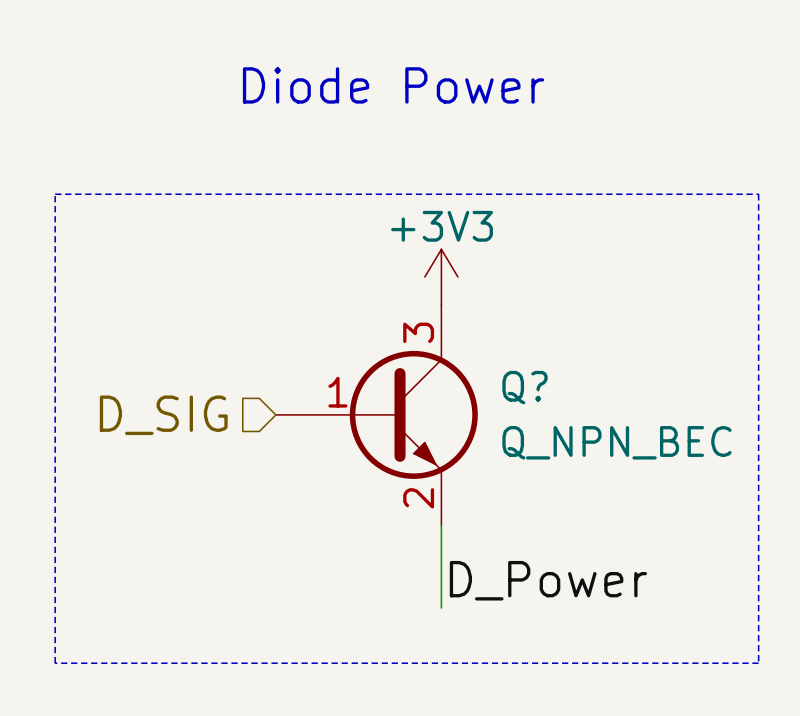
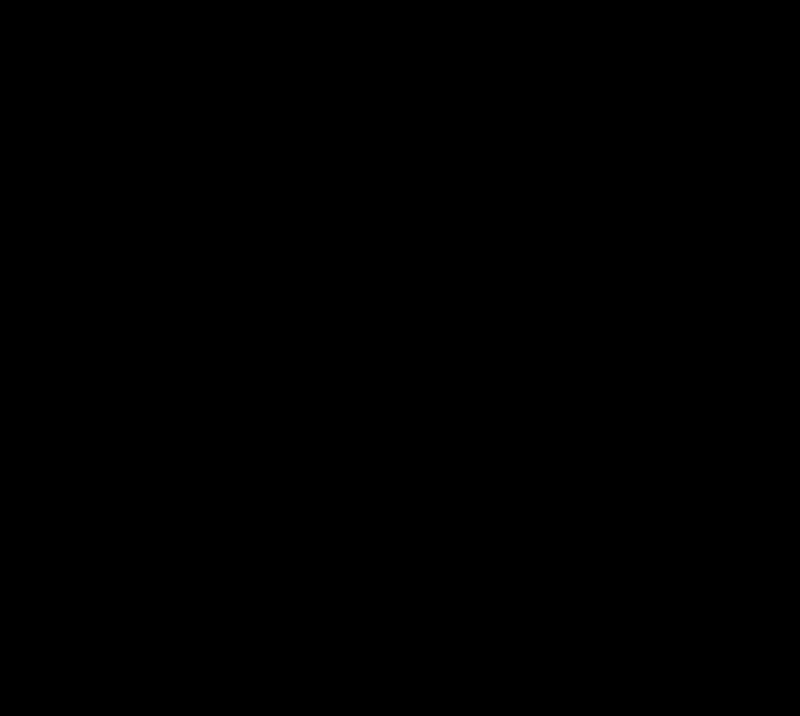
text: Diode Power (393, 85) -> none
line: (55, 194) (758, 194) (758, 663) (55, 663) (55, 194) -> none
power symbol: +3V3 (441, 276) -> none
Q?: Q_NPN_BEC (376, 414) -> none
hierarchical label: D_SIG (163, 415) -> none
wire: (441, 525) (441, 608) -> none
label: D_Power (548, 580) -> none

